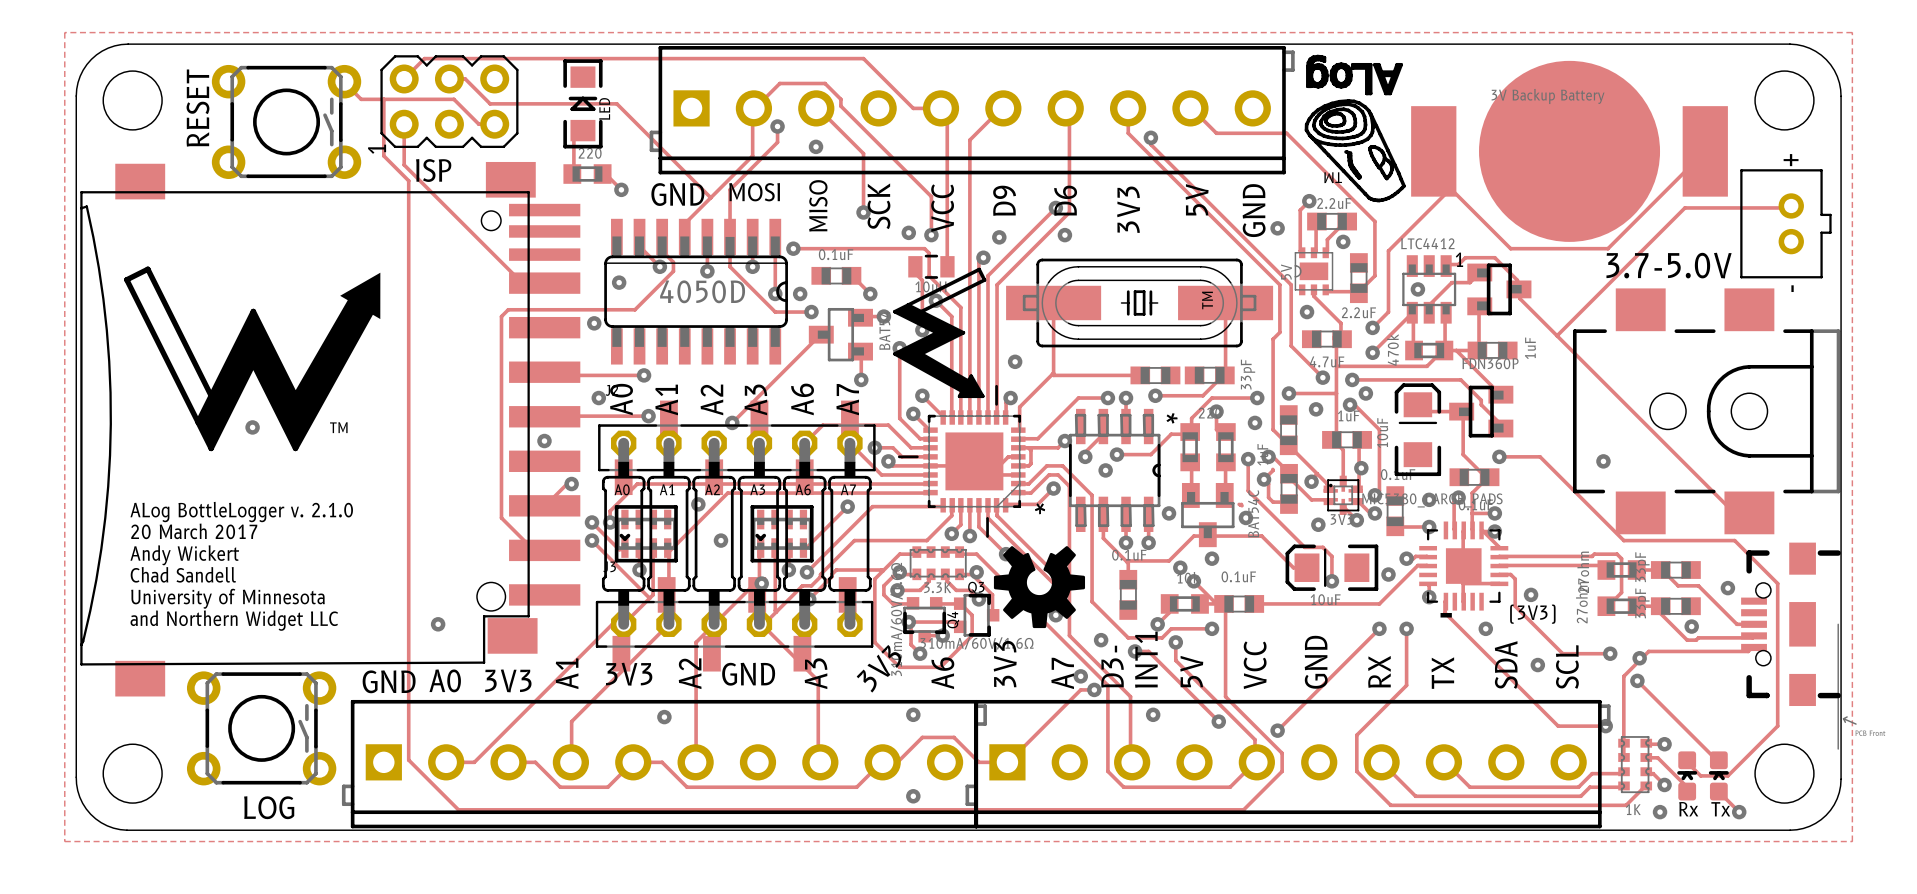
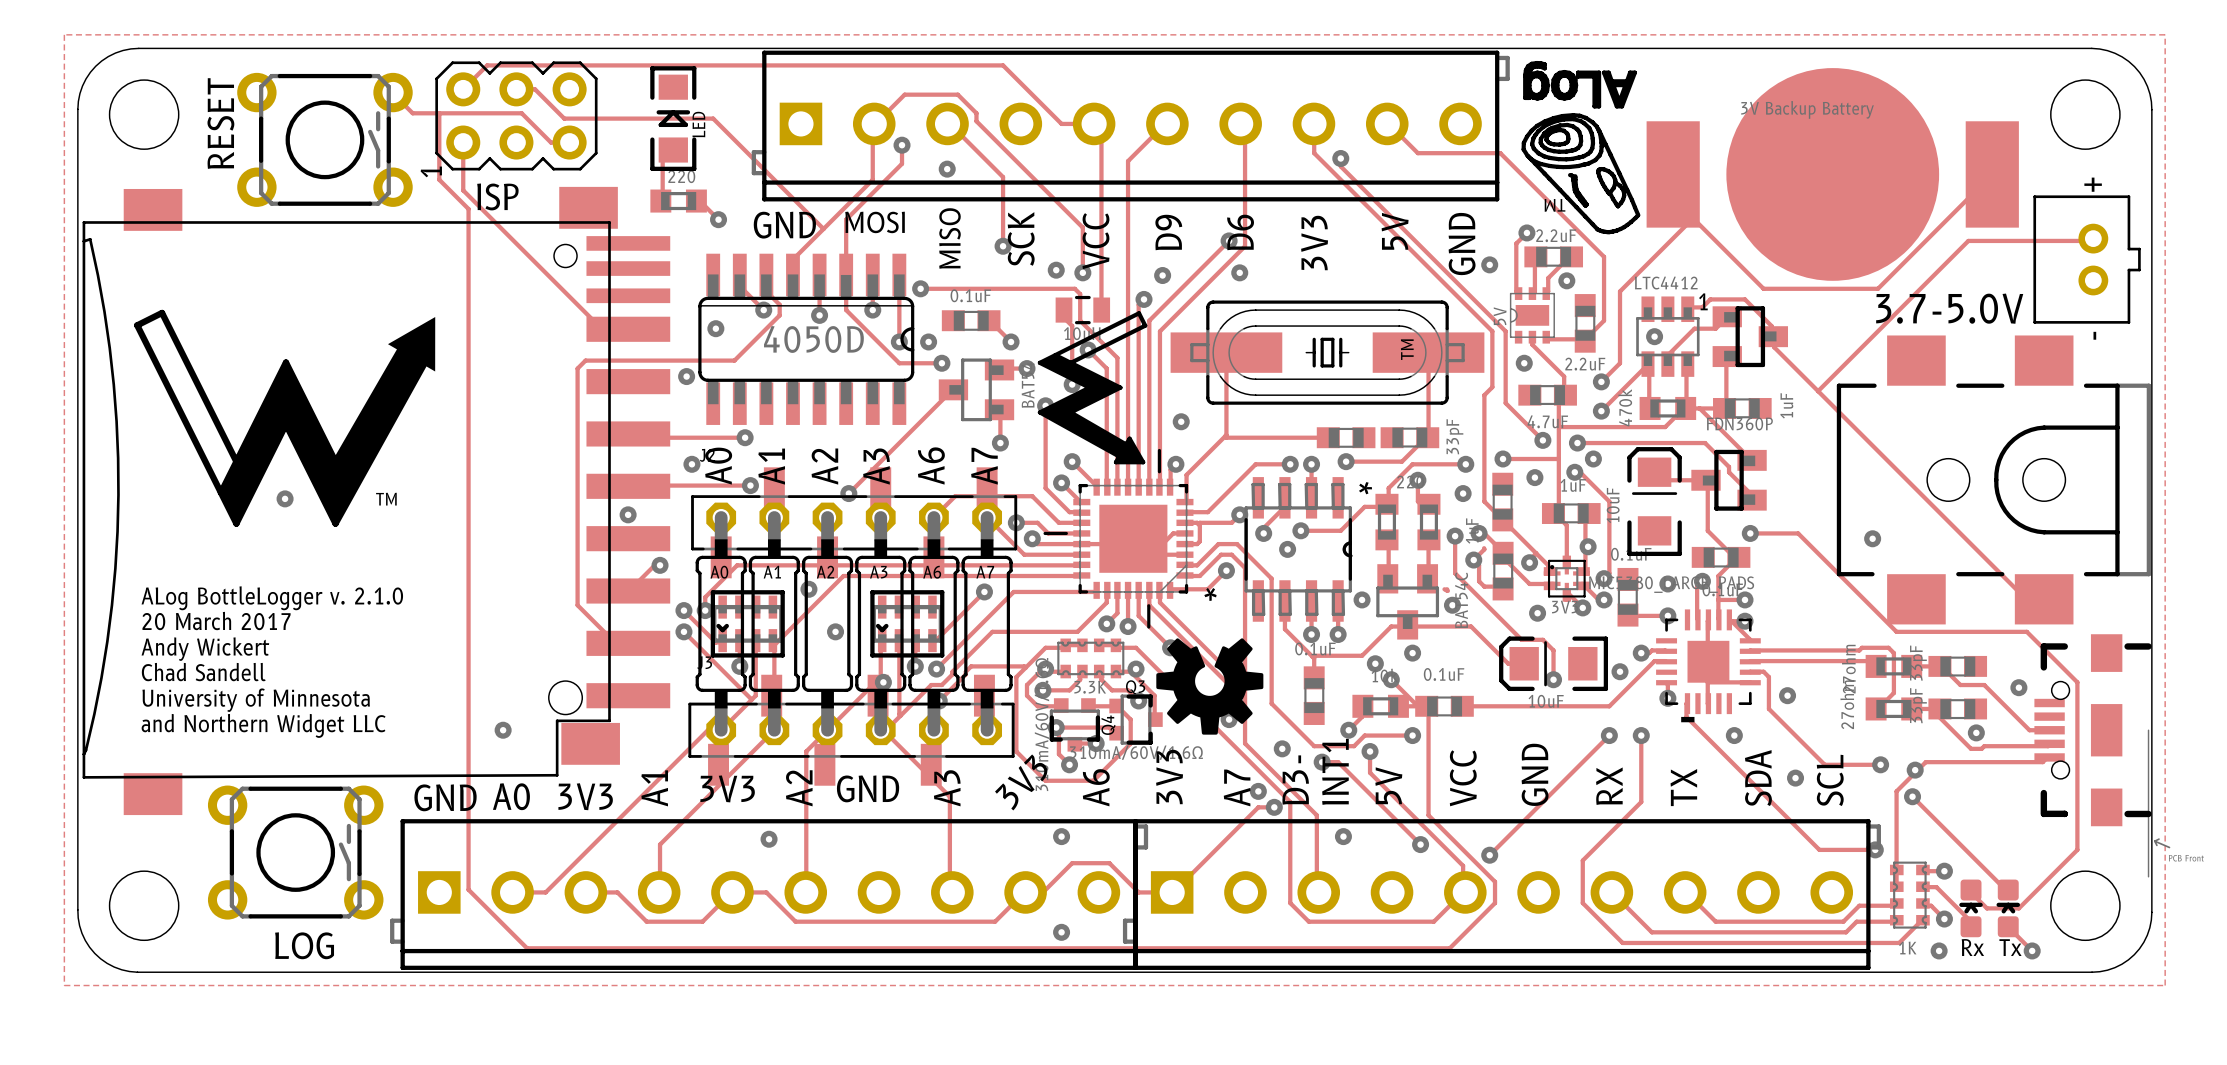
text: (3V3) (1532, 614) -> none

